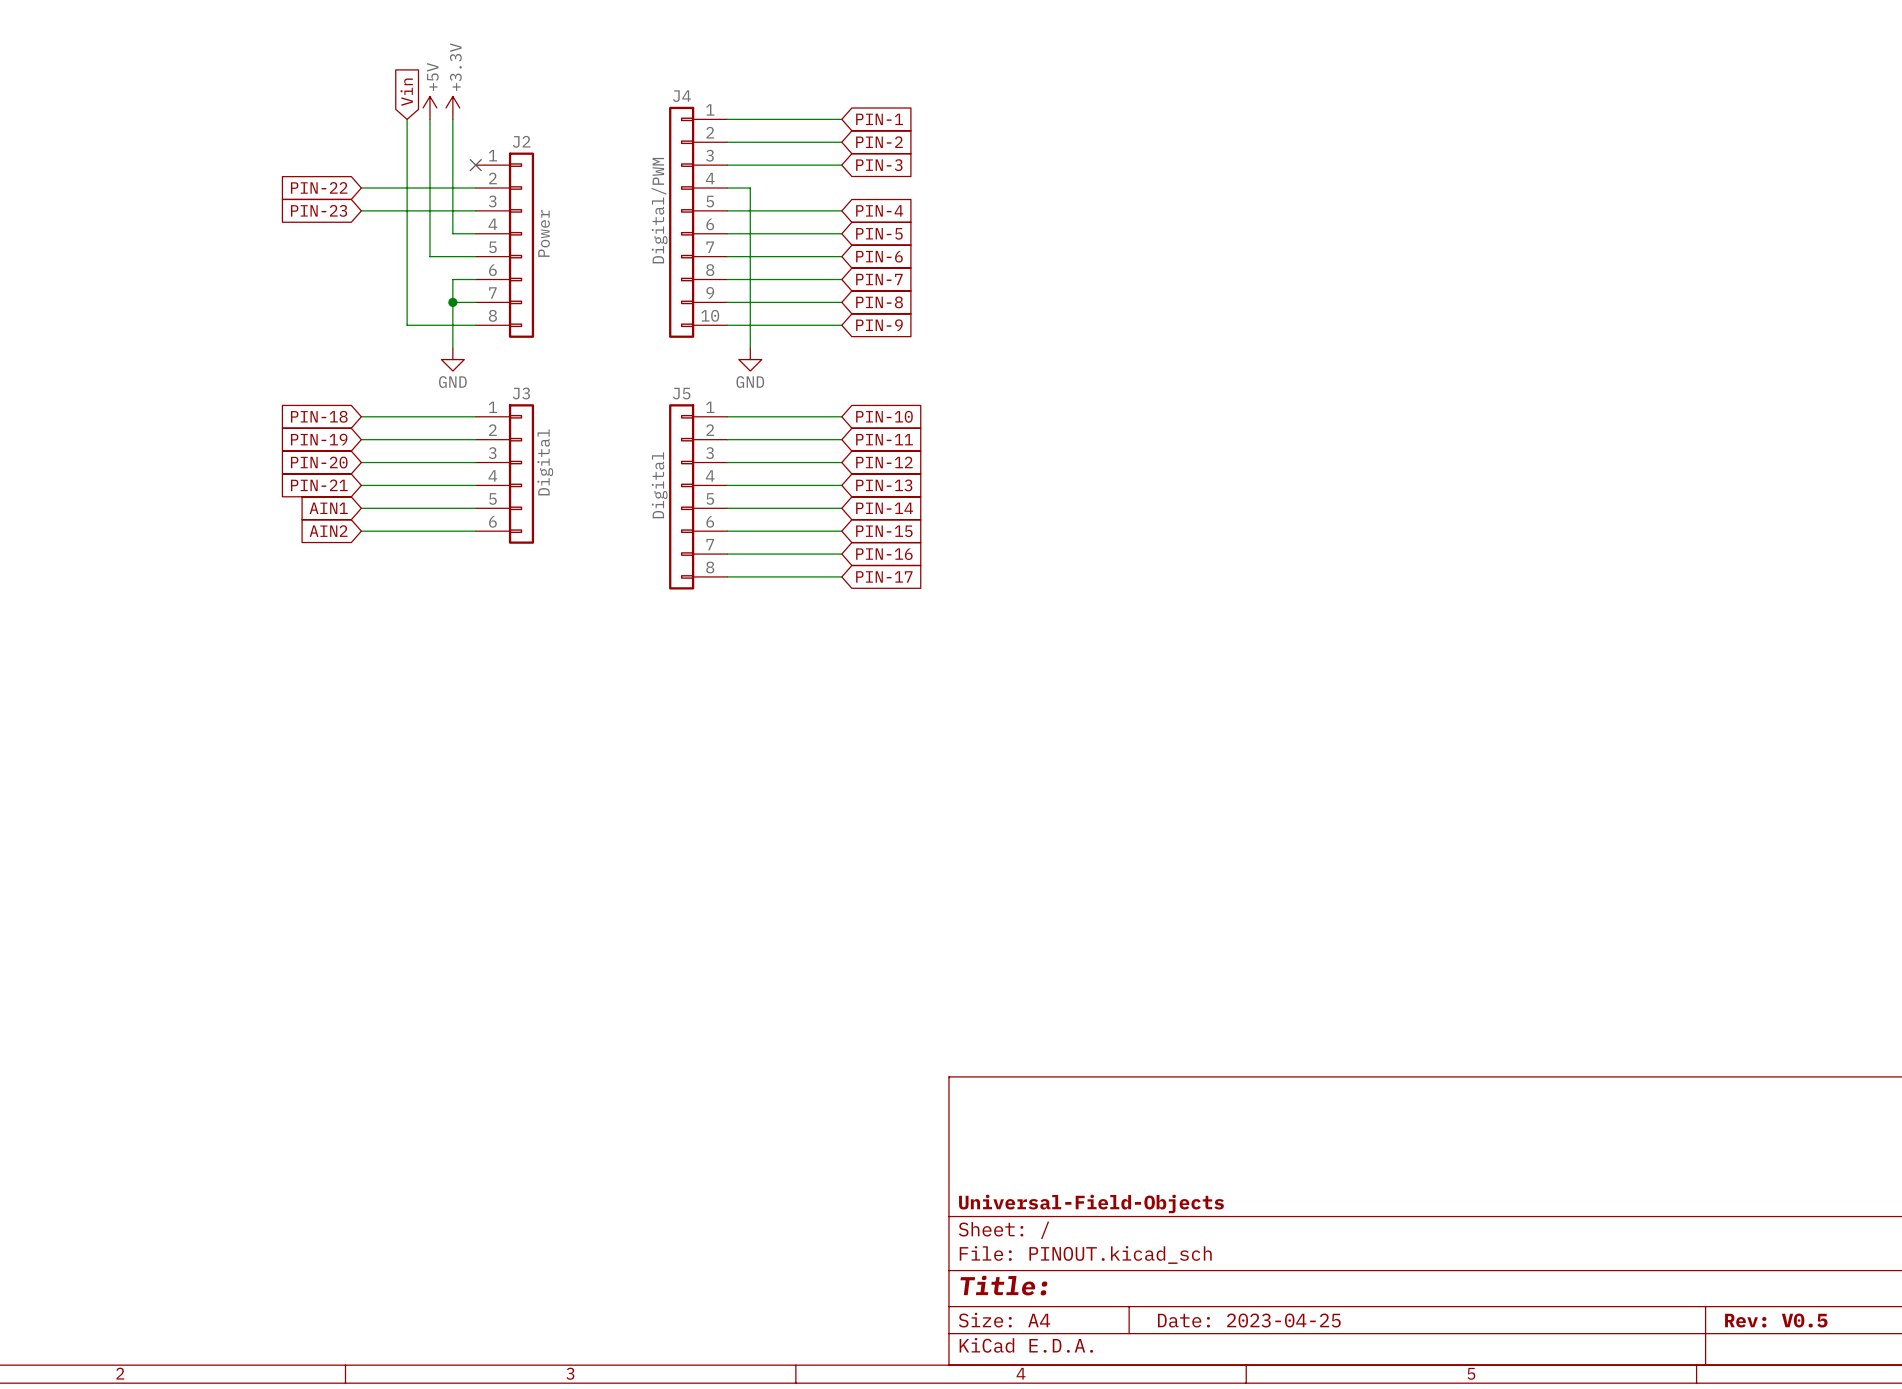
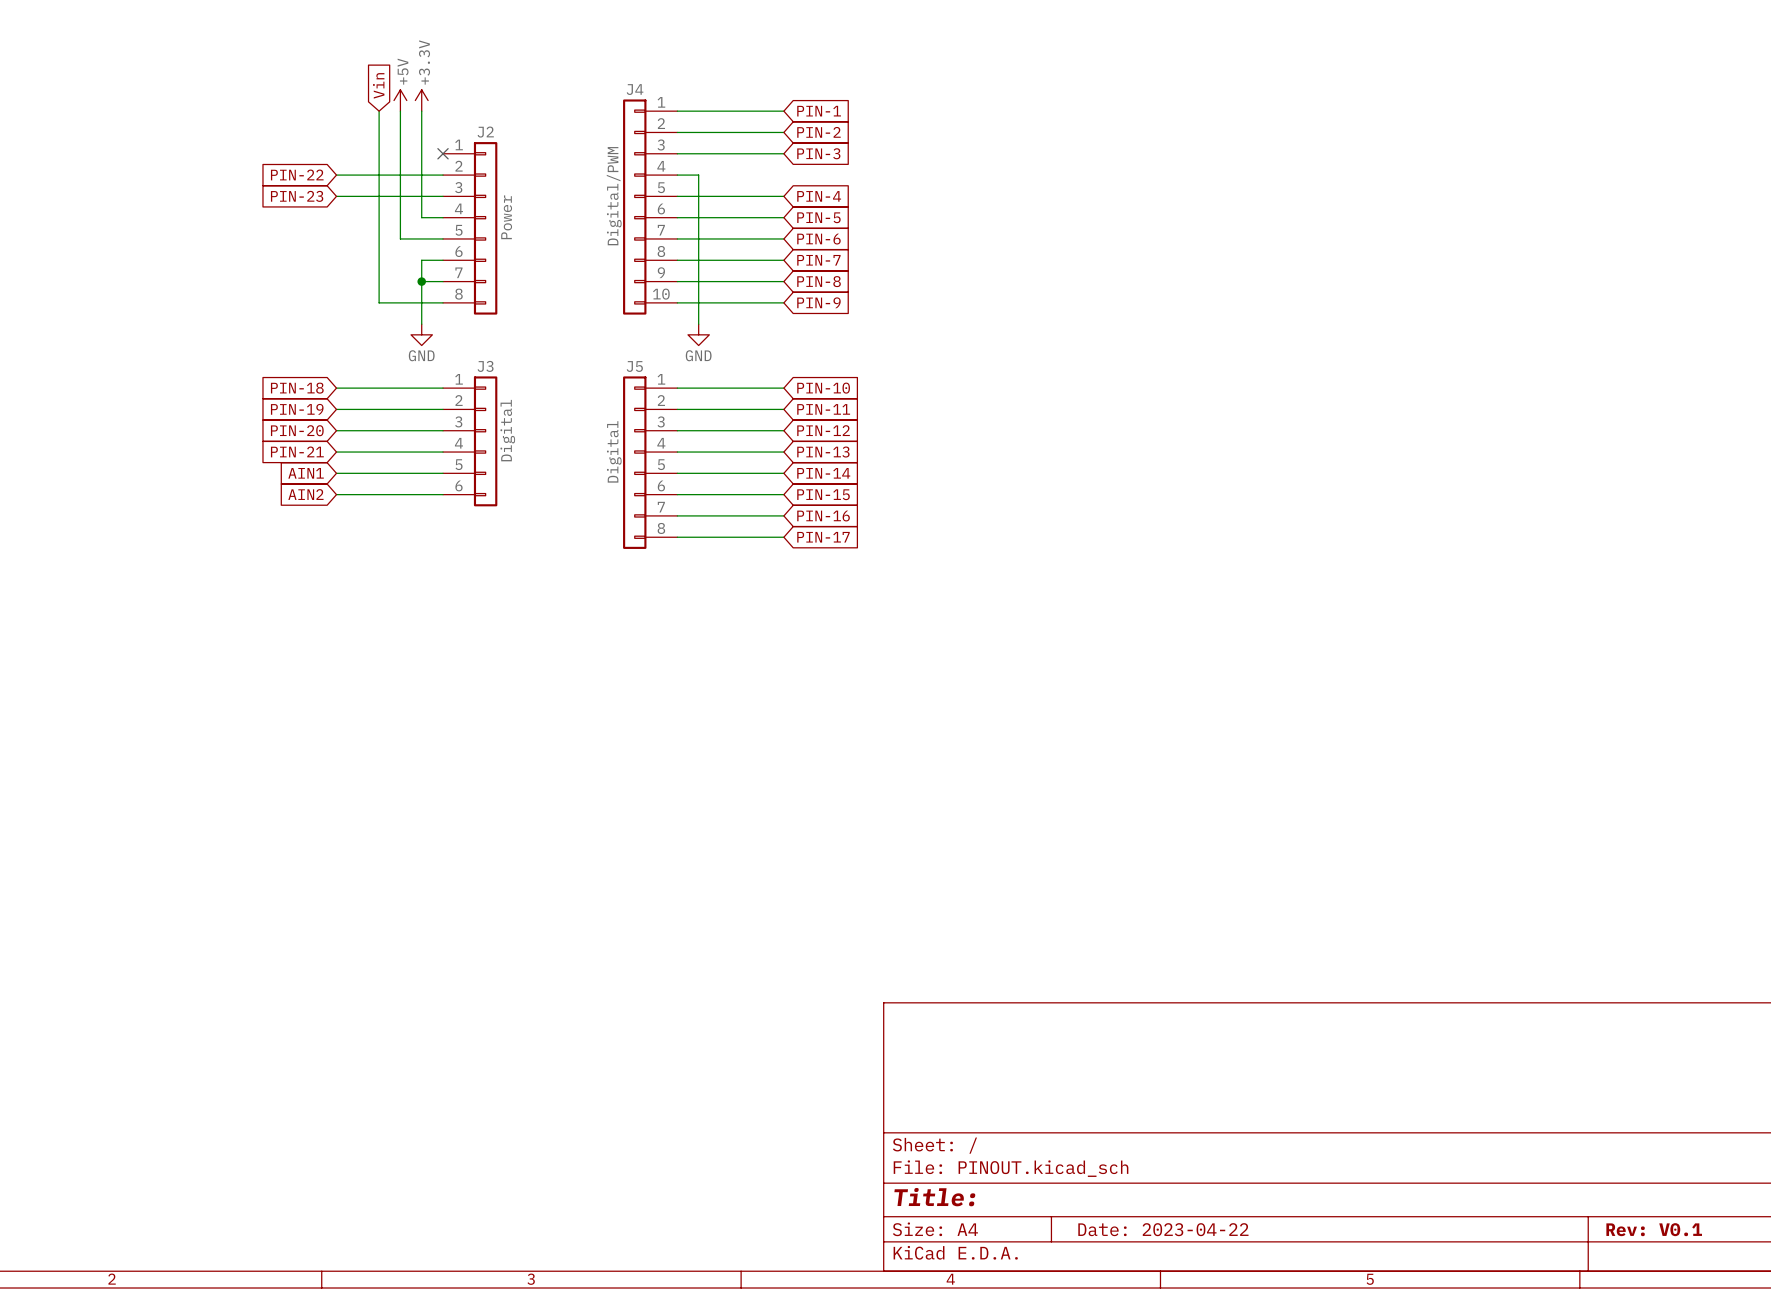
title block: Universal-Field-Objects (1091, 1203) -> none
title block: Date: 2023-04-25 (1249, 1320) -> Date: 2023-04-22 (1163, 1229)
title block: Rev: V0.5 (1776, 1320) -> Rev: V0.1 (1654, 1229)

